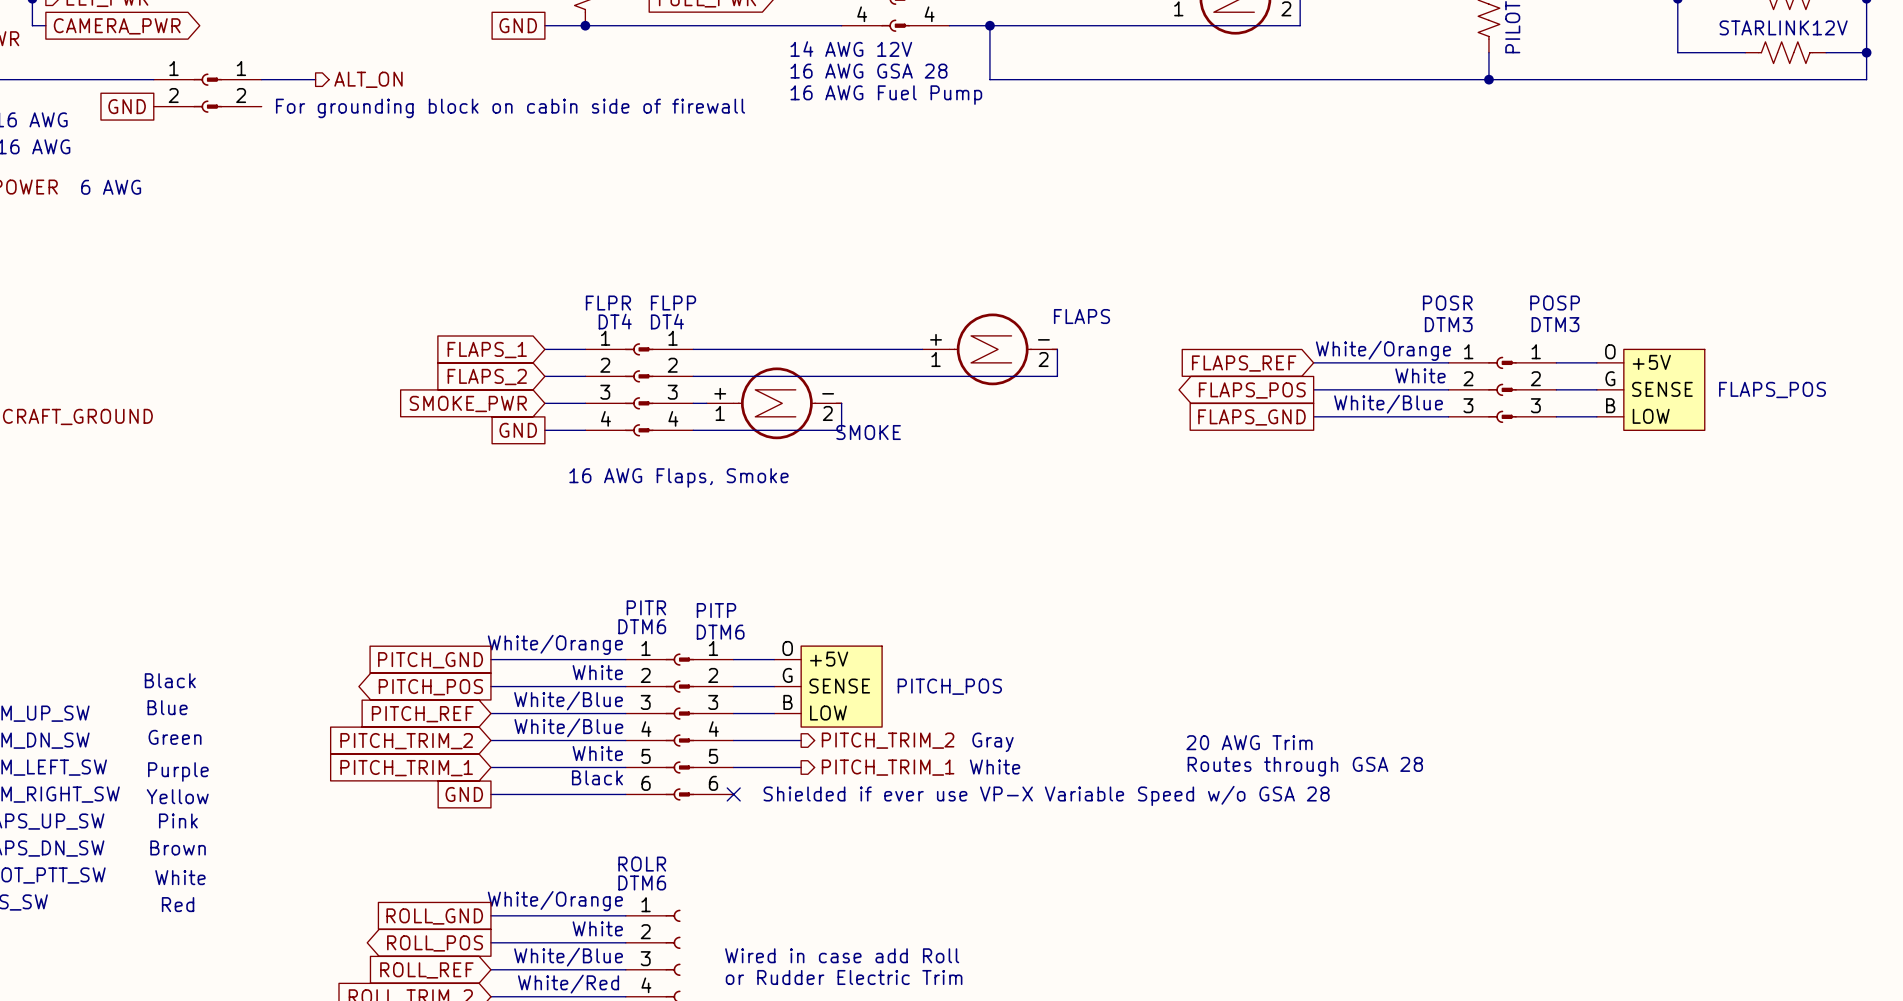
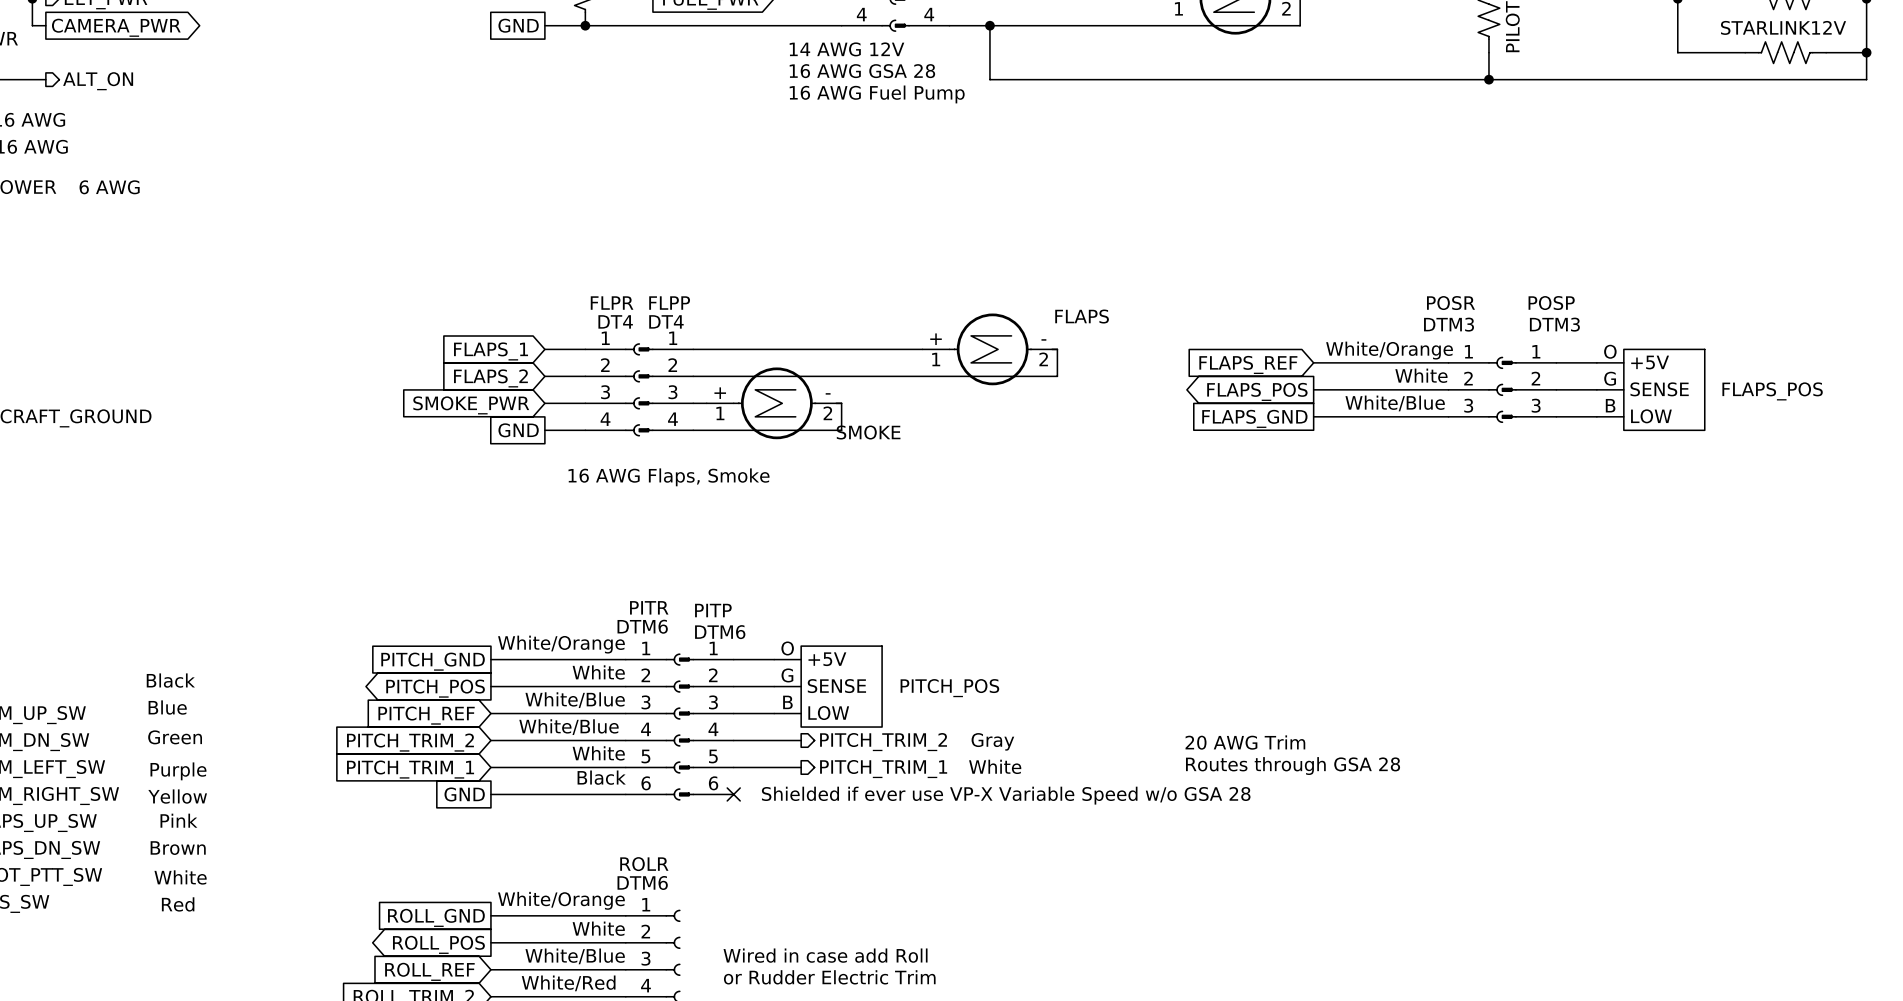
wire: (45, 79) (153, 79) -> none
hierarchical label: none -> ALT_ON (98, 81)
wire: (261, 79) (315, 79) -> none
hierarchical label: ALT_ON (368, 79) -> none
part: (181, 93) -> none
part: (234, 93) -> none
global label: GND (127, 106) -> none
text: For grounding block on cabin side of firewall (510, 108) -> none

